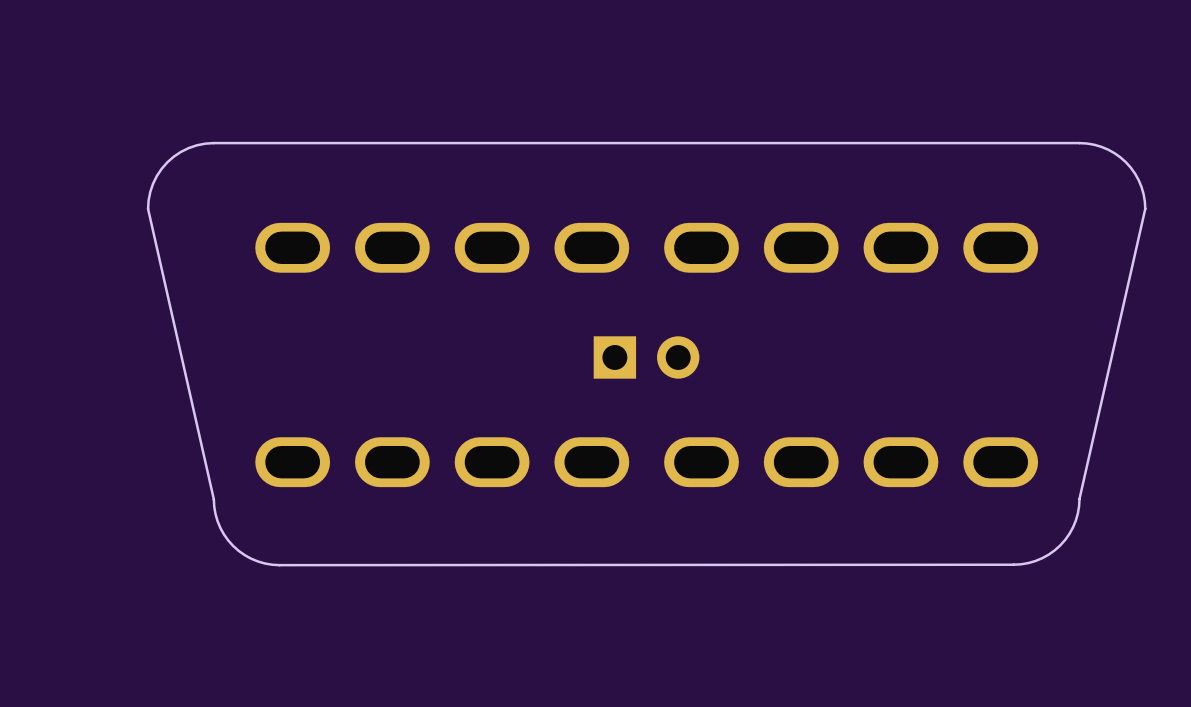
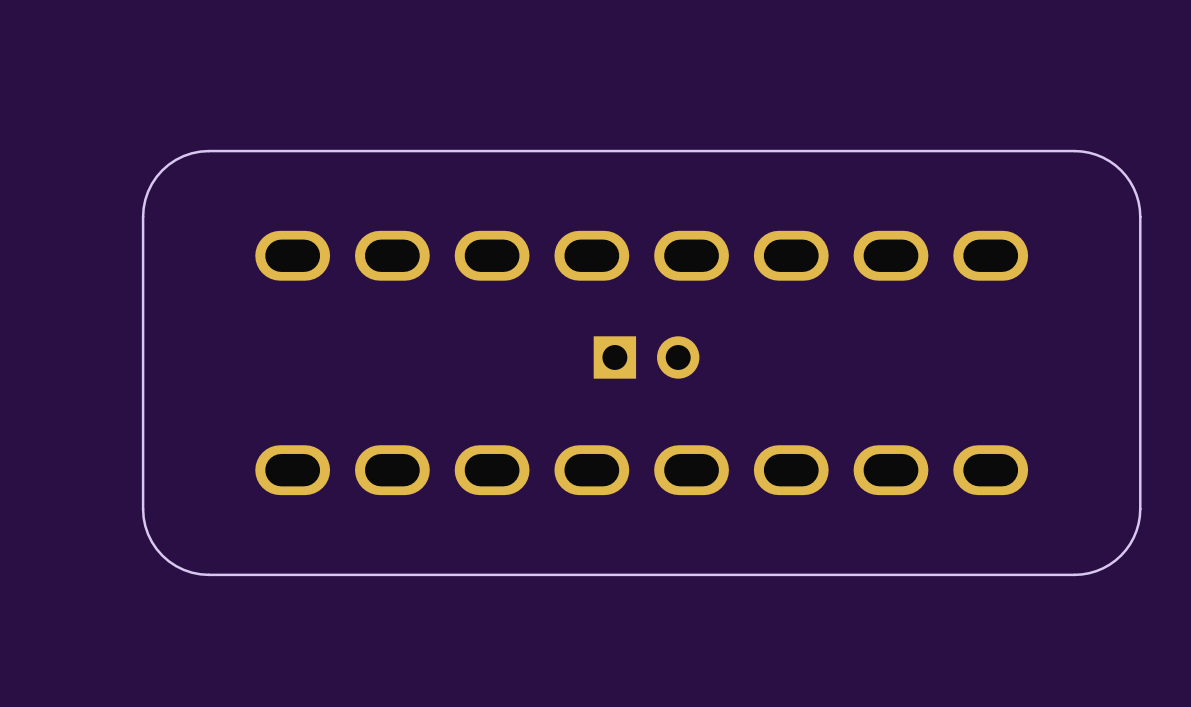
part footprint: [146, 141, 1147, 567] -> [141, 149, 1142, 577]

